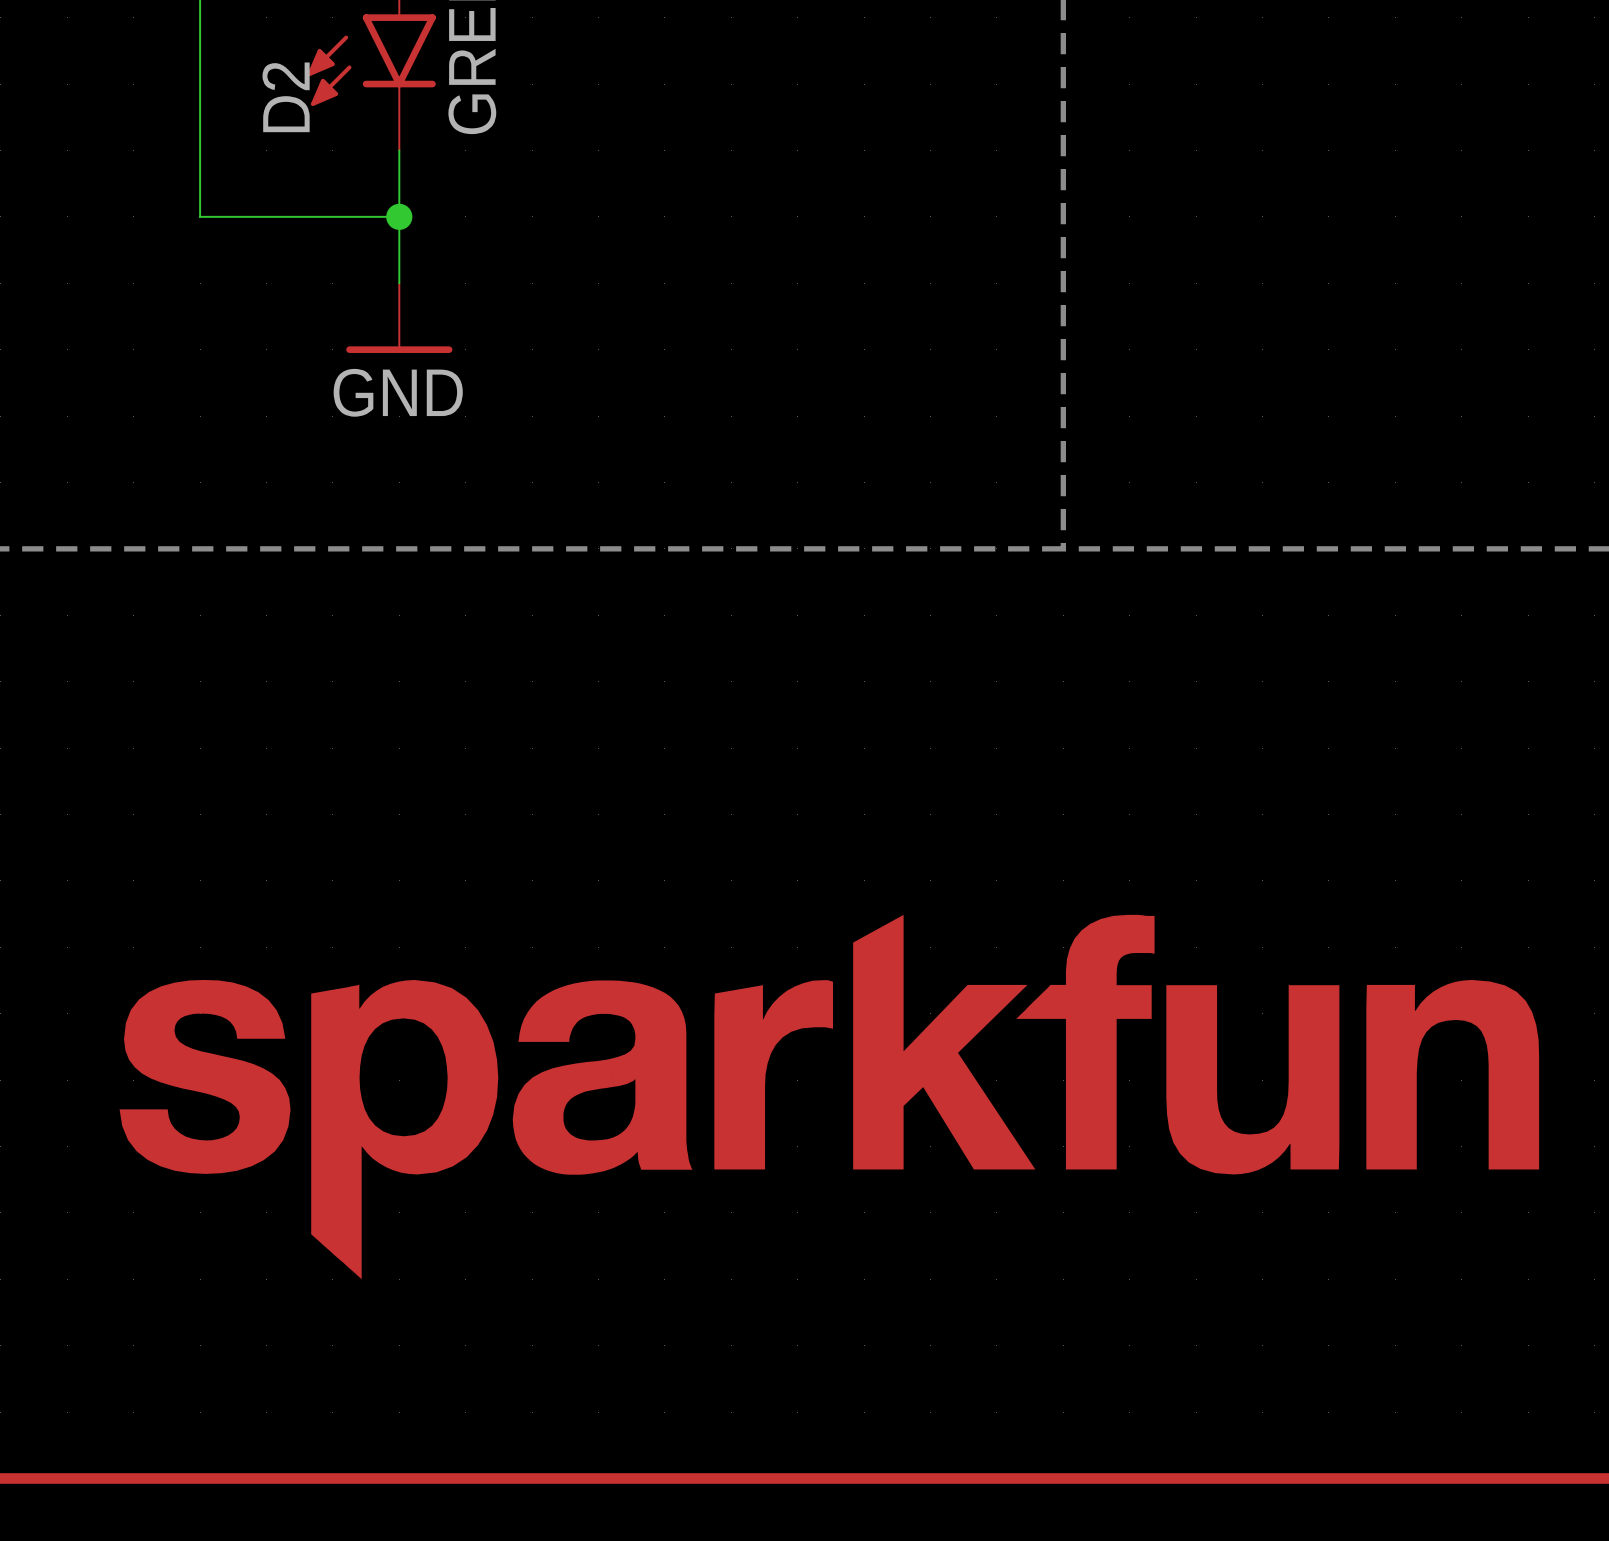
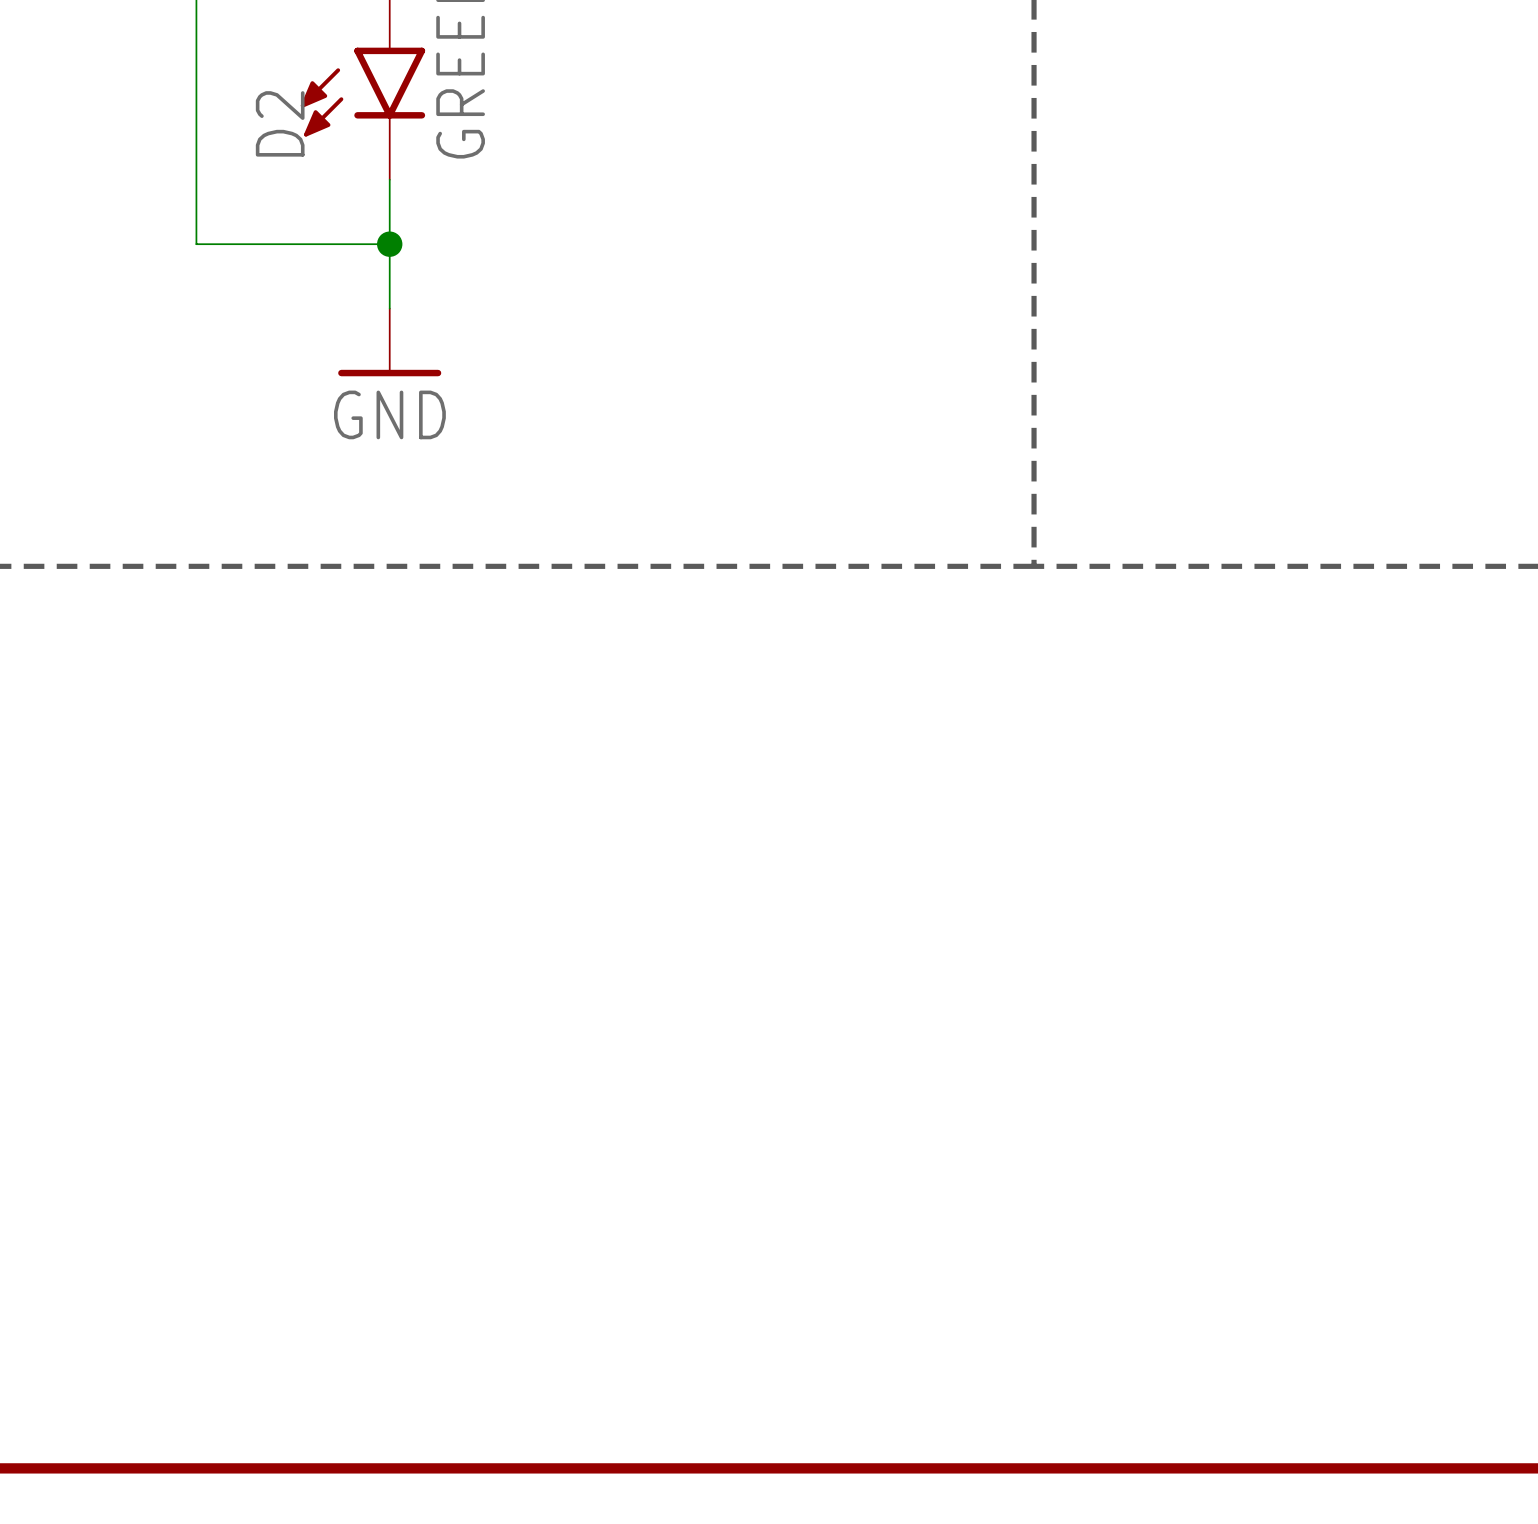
part: (829, 1097) -> none

